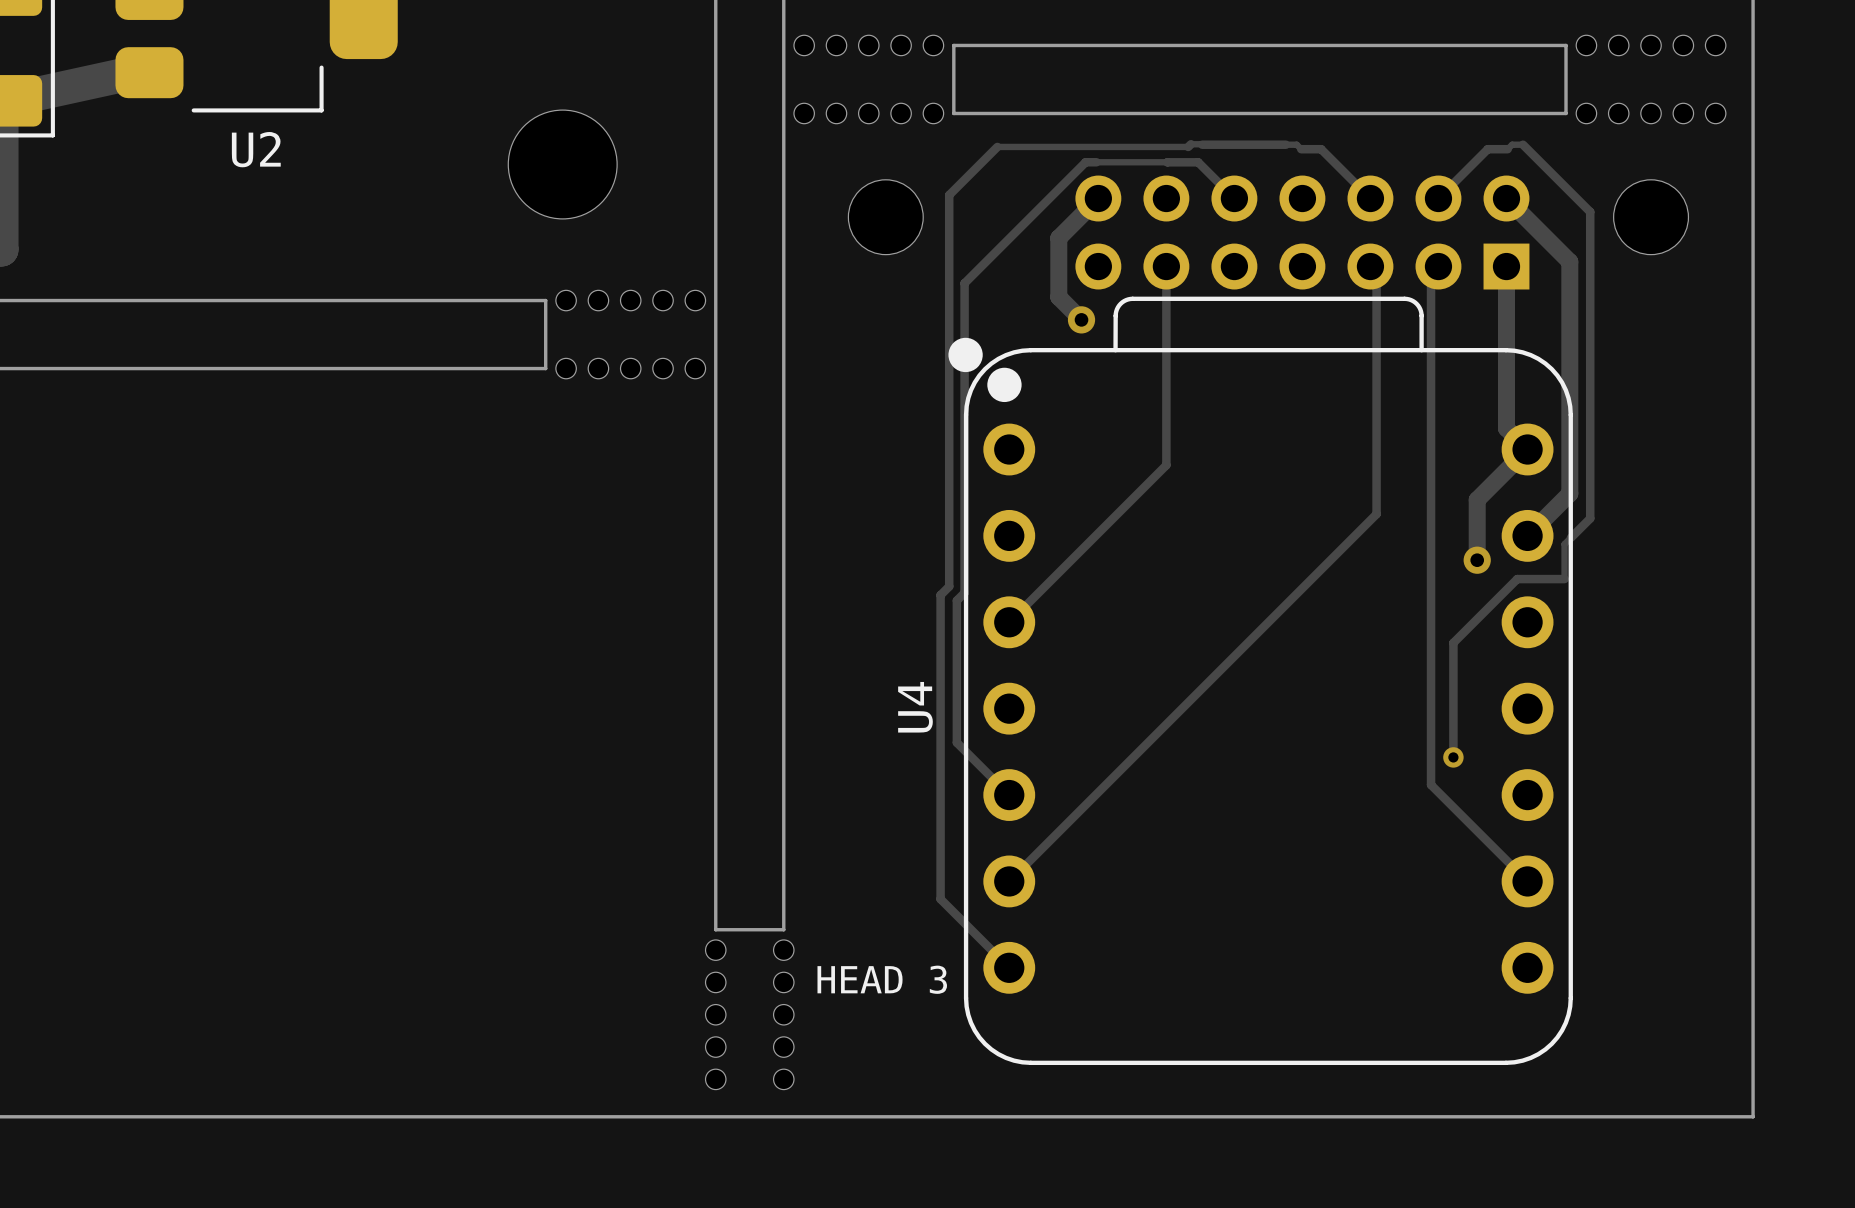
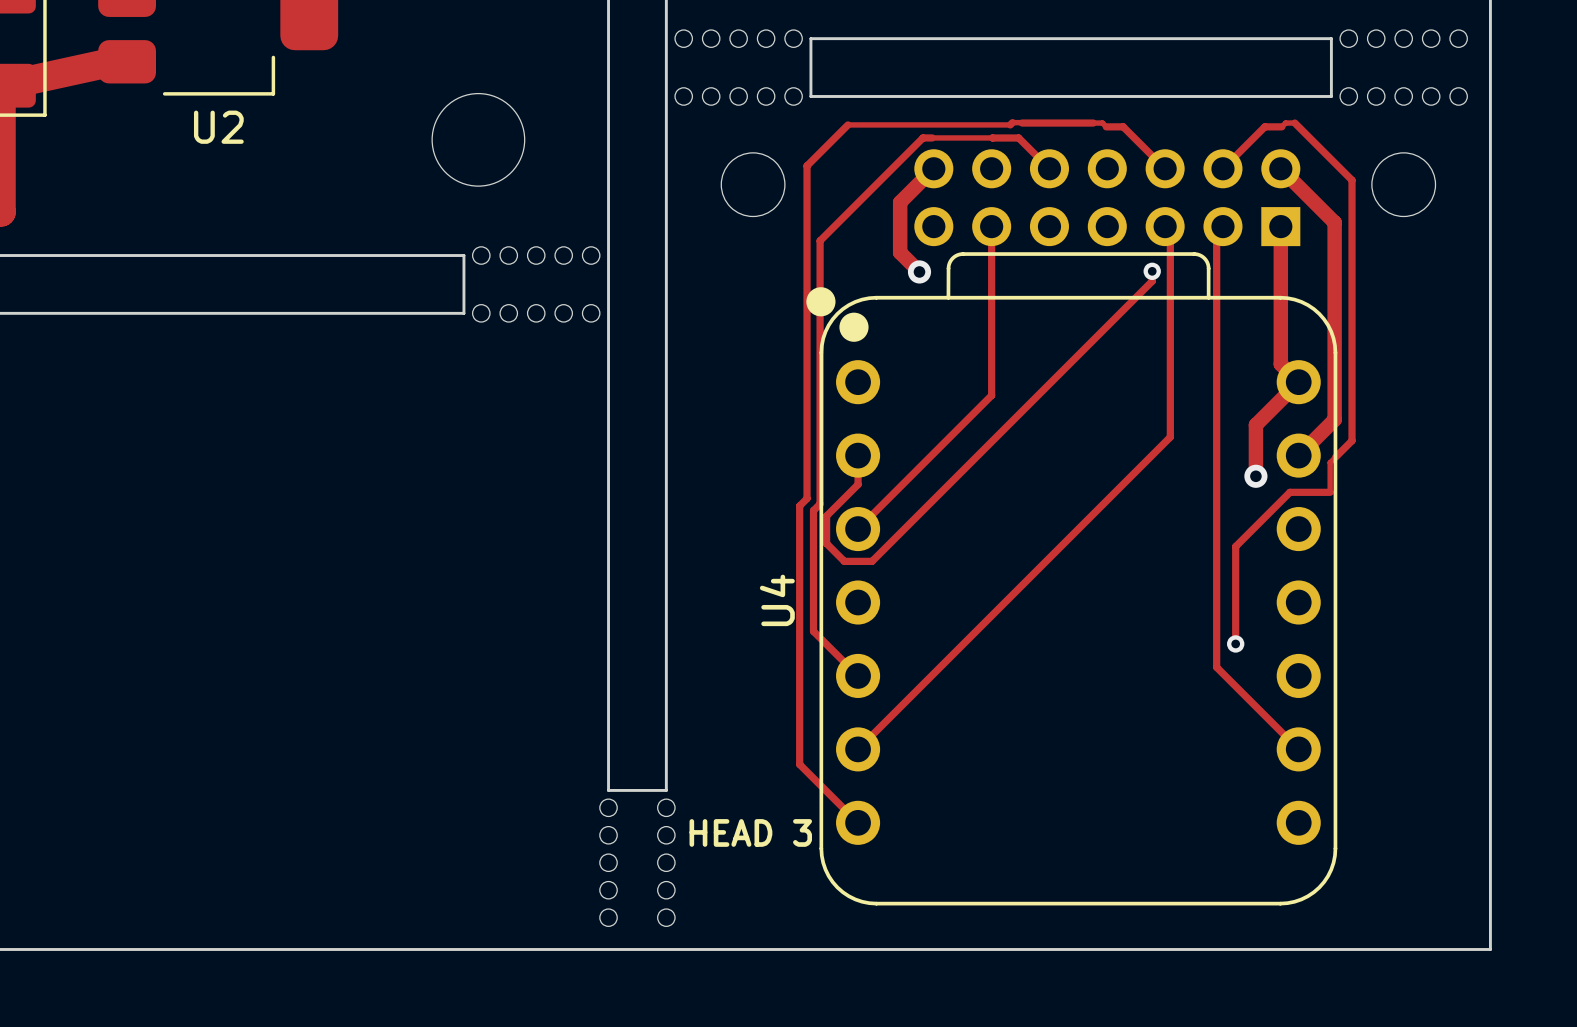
track: none -> (1152, 271) (1152, 281) (872, 561) (844, 561) (826, 543) (826, 516) (858, 484) (858, 455)
via: none -> (1152, 271)

